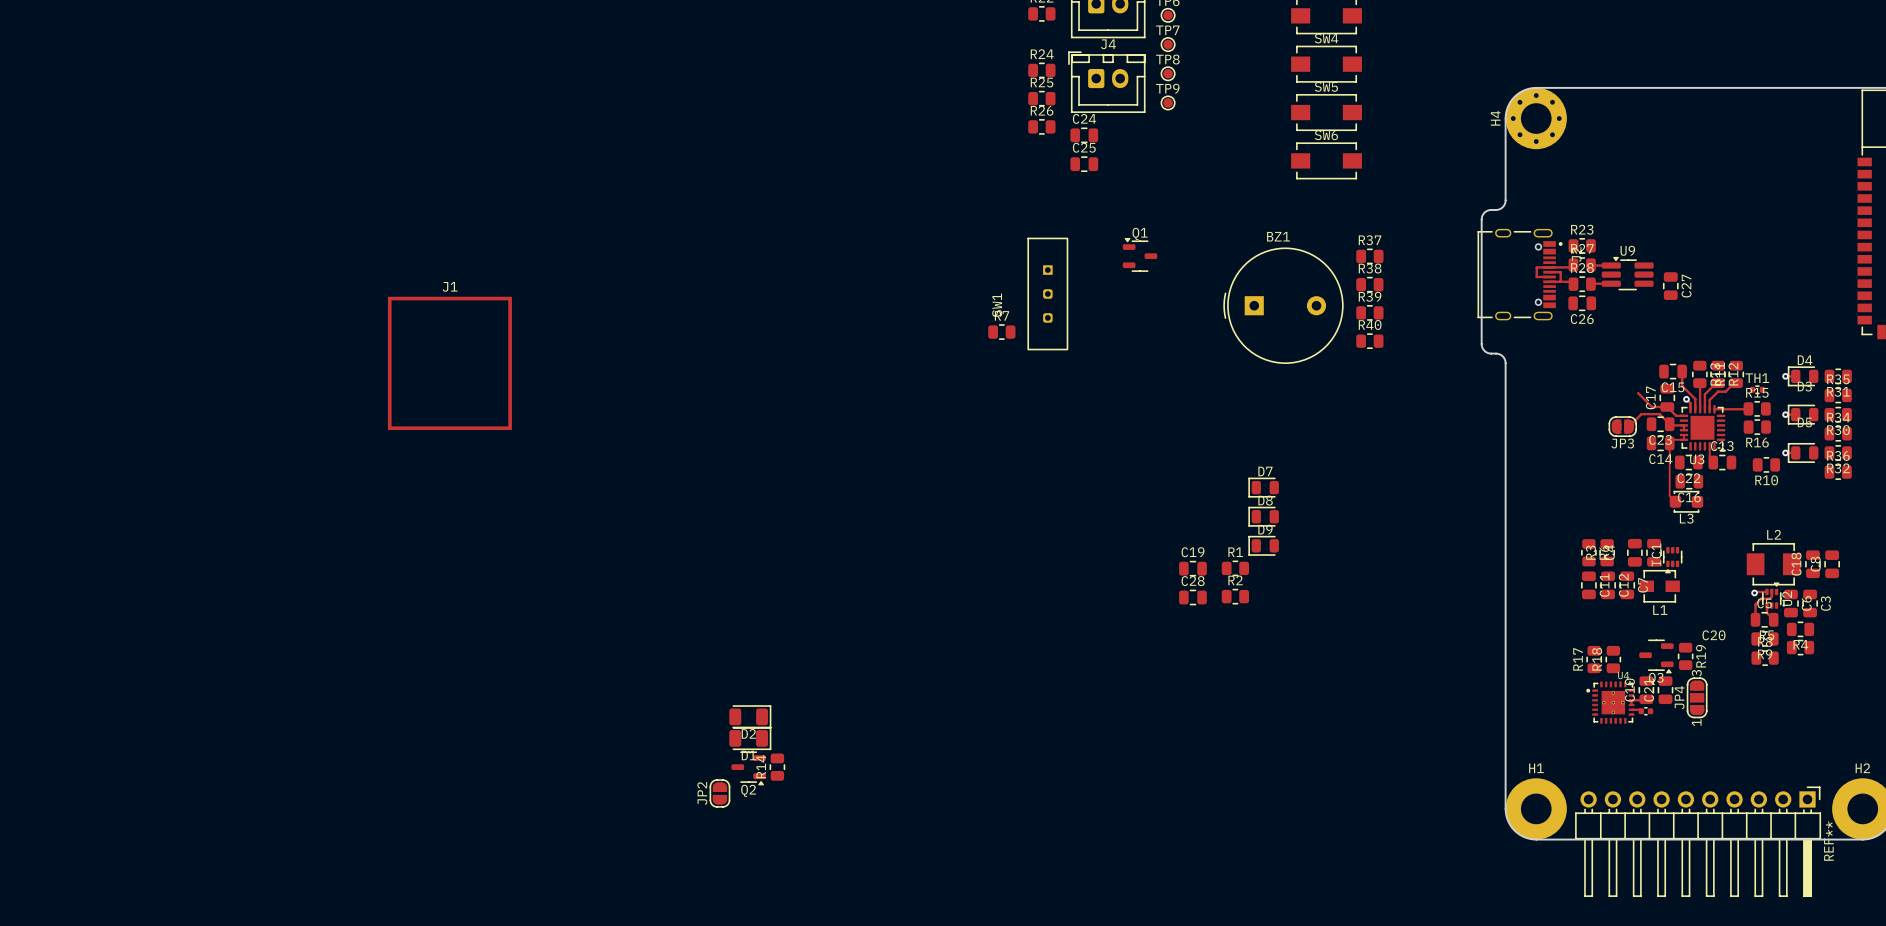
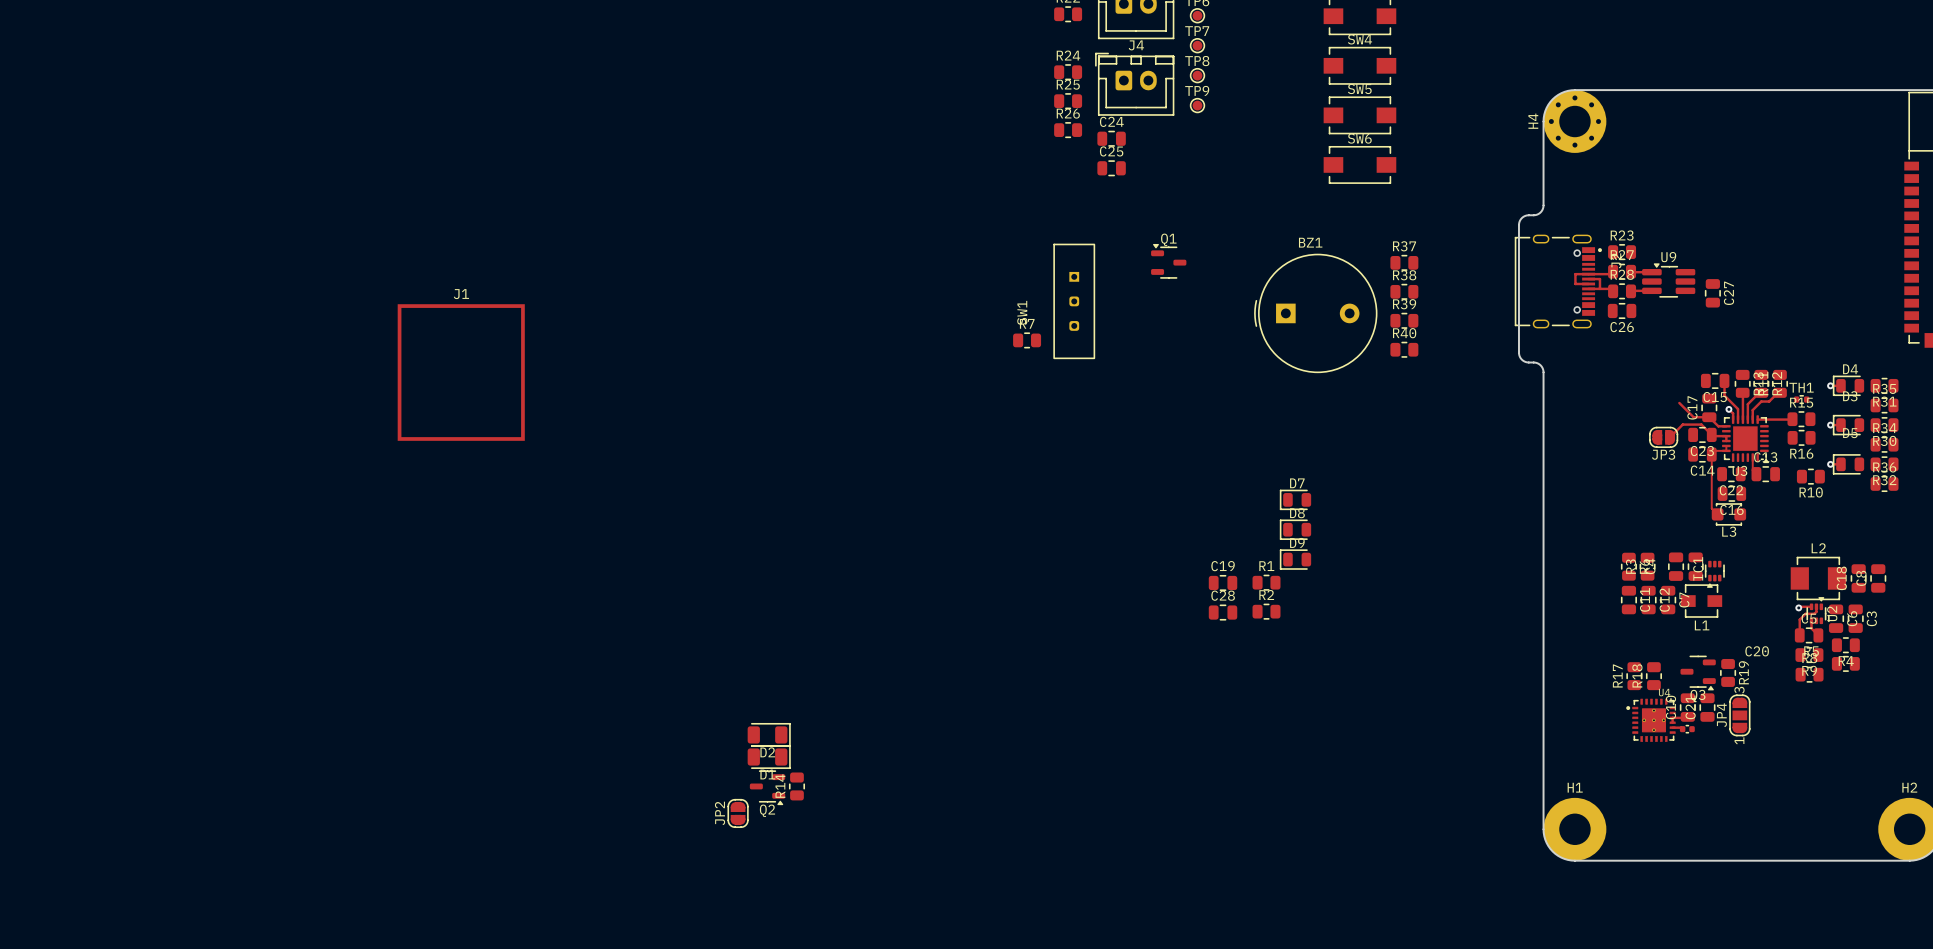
REF**: (1698, 841) -> none

